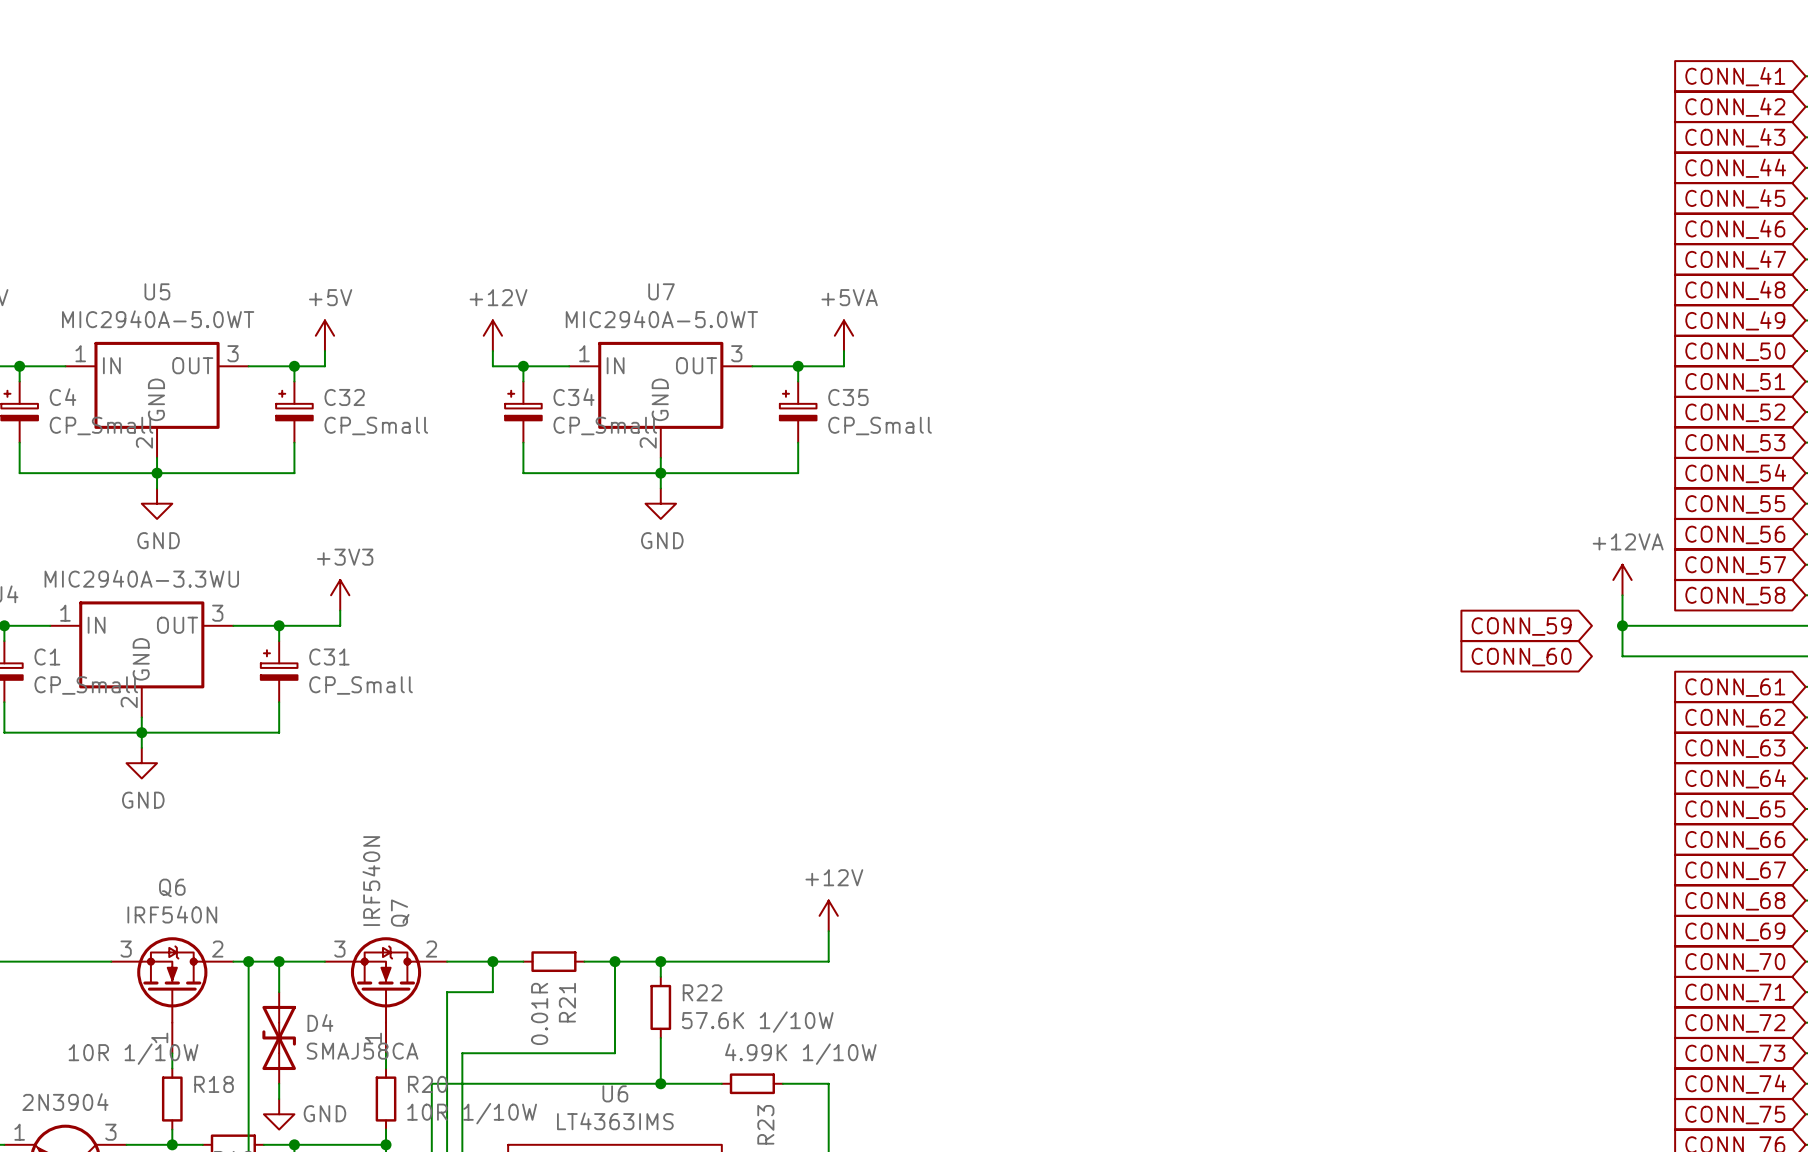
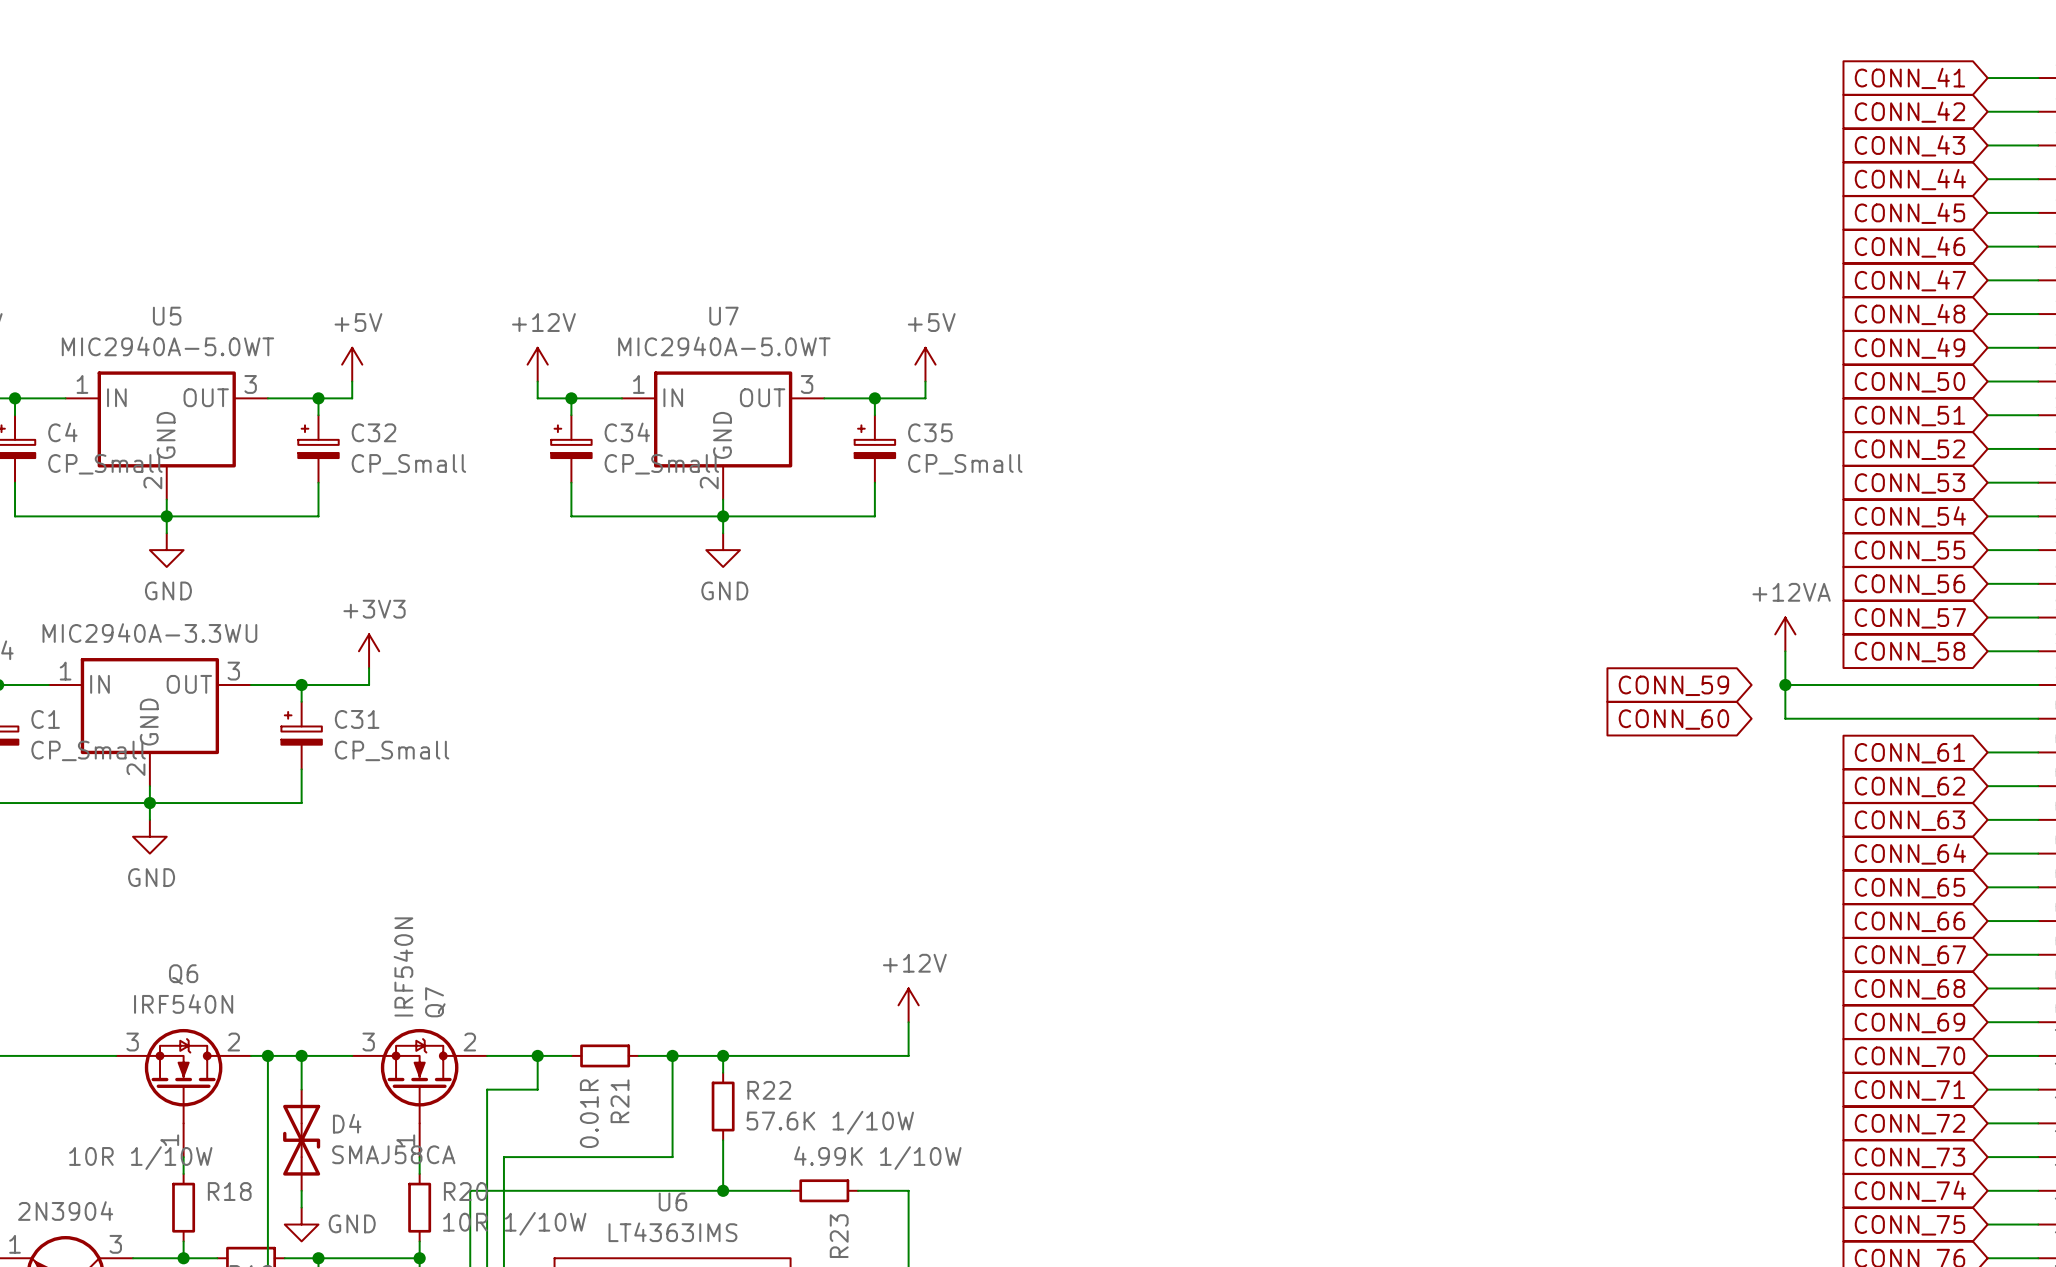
power symbol: +5VA (843, 335) -> +5V (925, 364)

